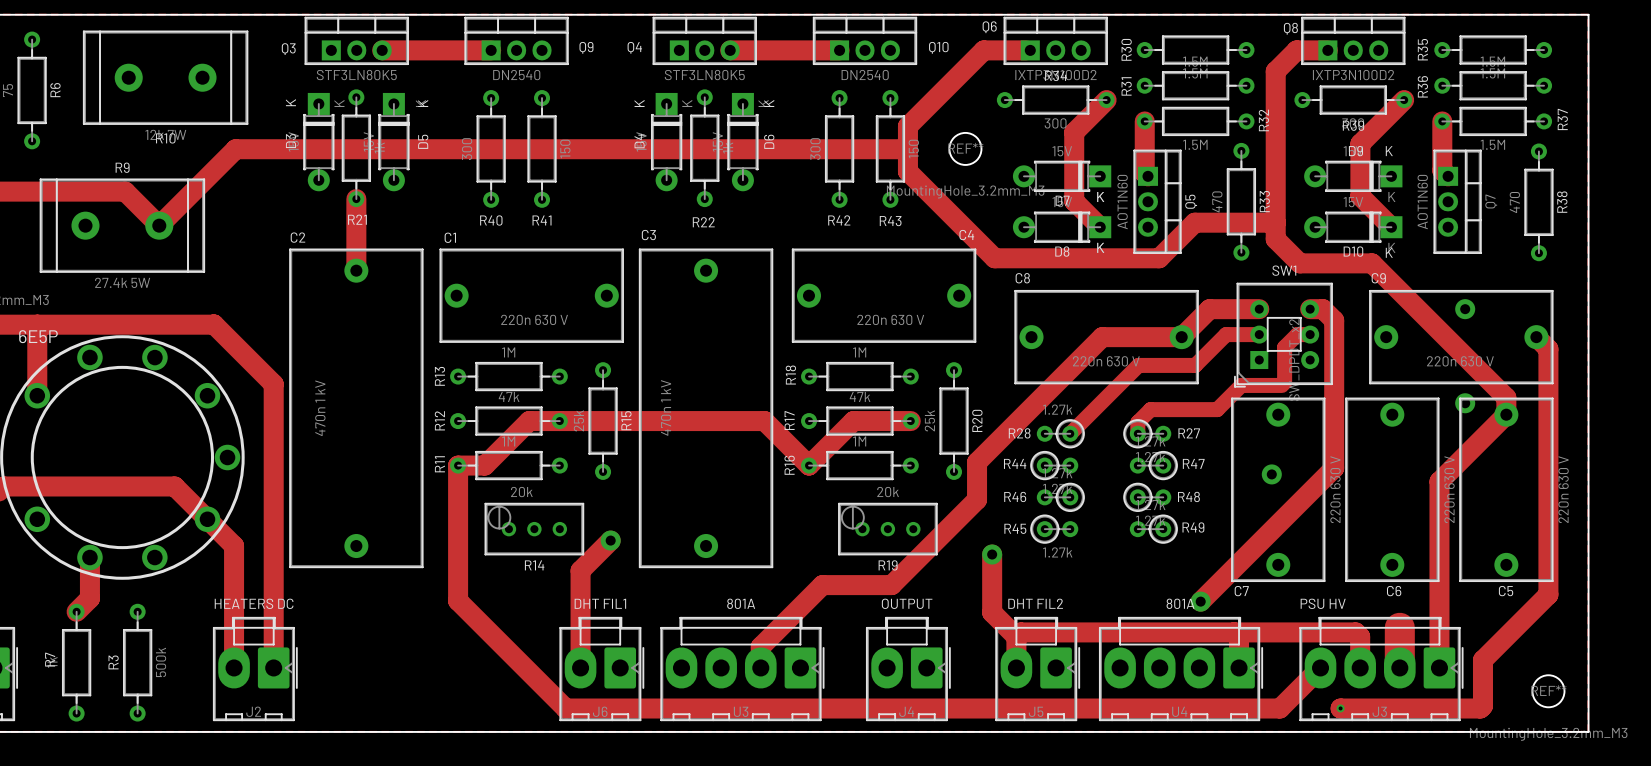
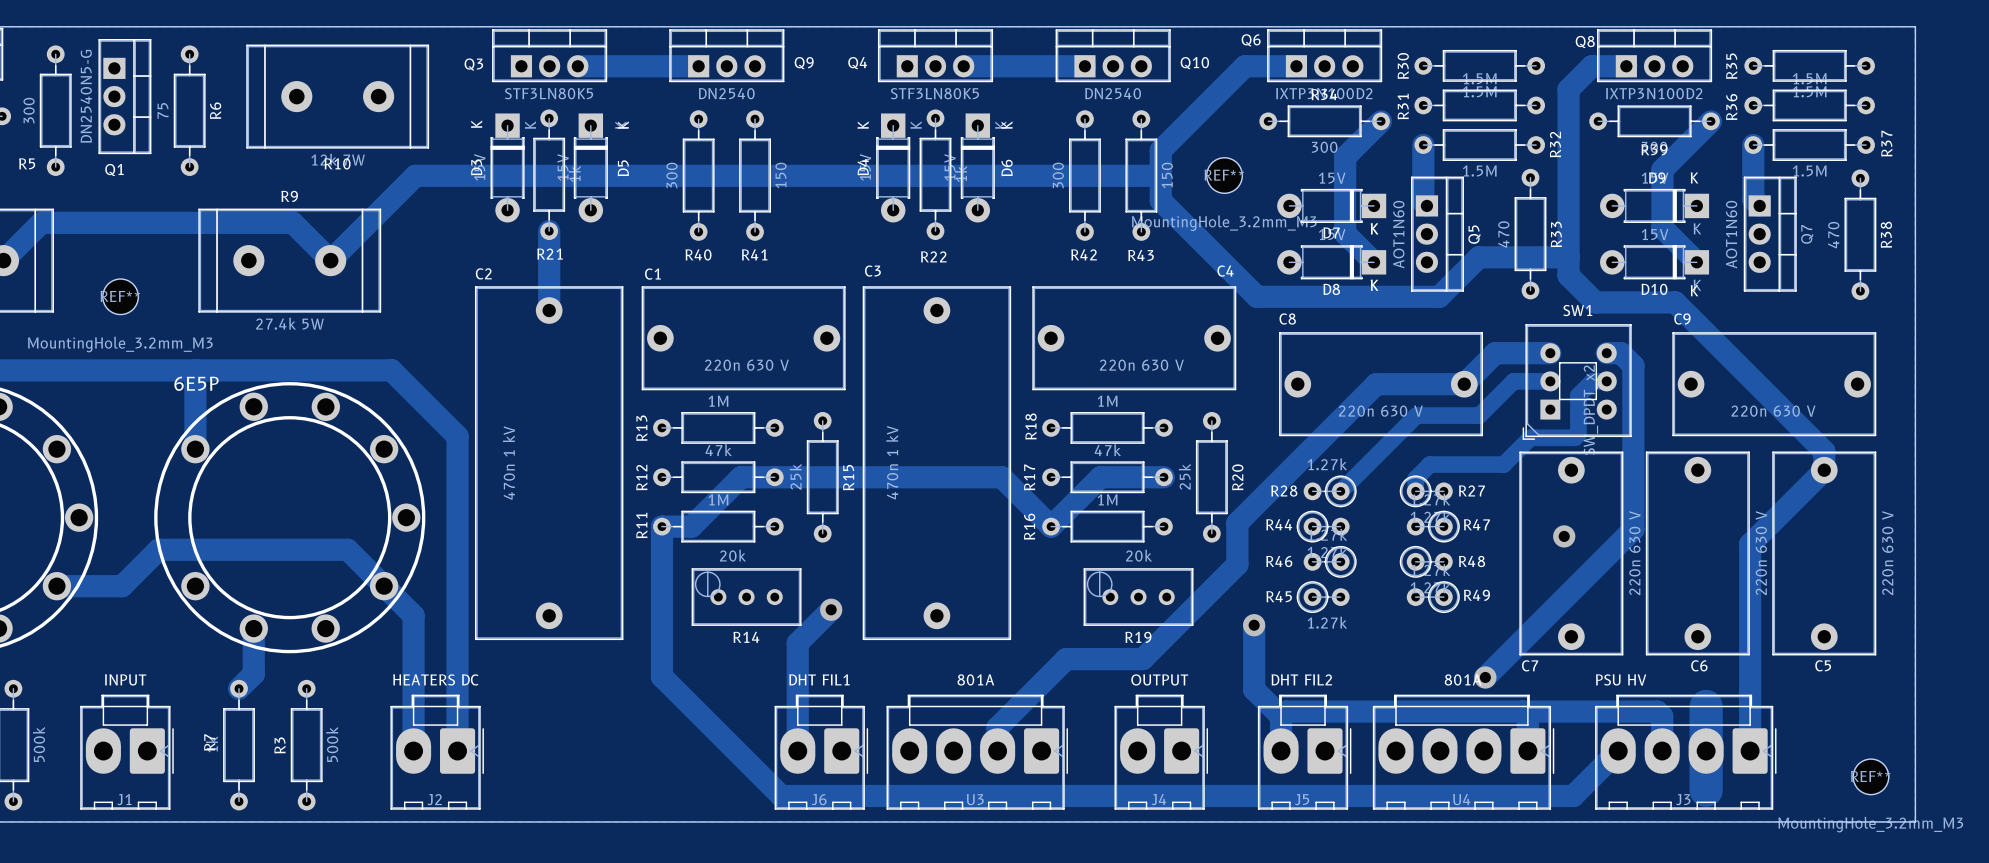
via: (1465, 309) -> none
track: (1536, 337) (1548, 349) (1548, 594) (1482, 660) (1482, 705) (1480, 708) (1340, 708) -> none
via: (1465, 403) -> none
track: none -> (1706, 751) (1706, 790)
via: (1340, 708) -> none

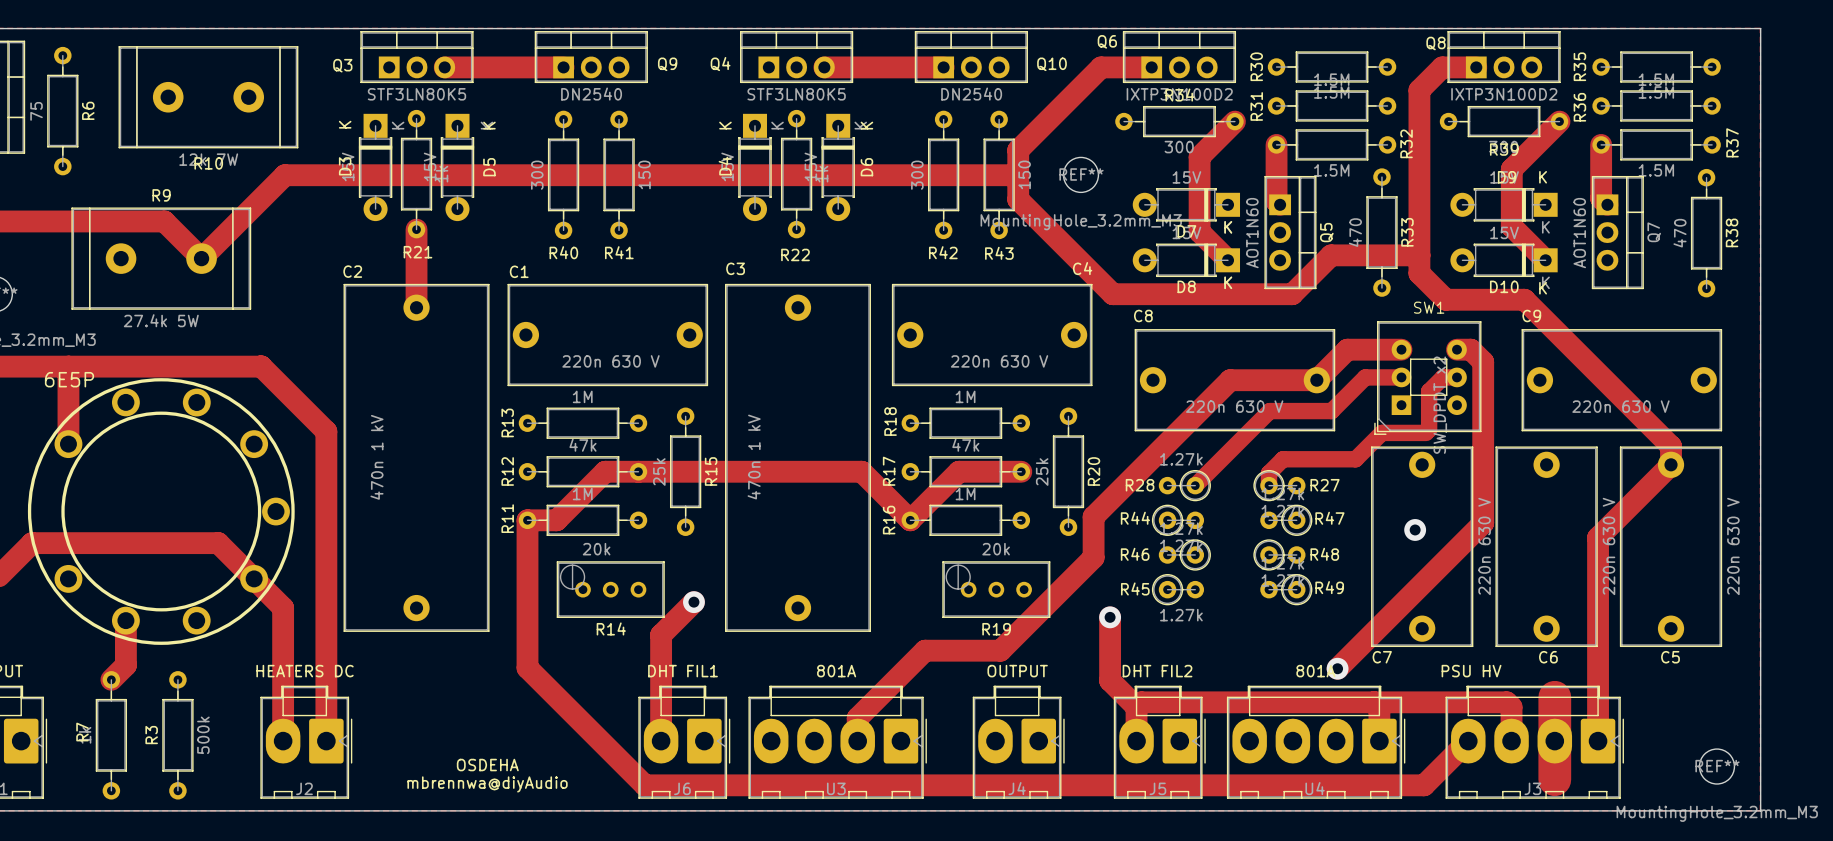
text: none -> OSDEHA (487, 765)
text: none -> mbrennwa@diyAudio (487, 784)

